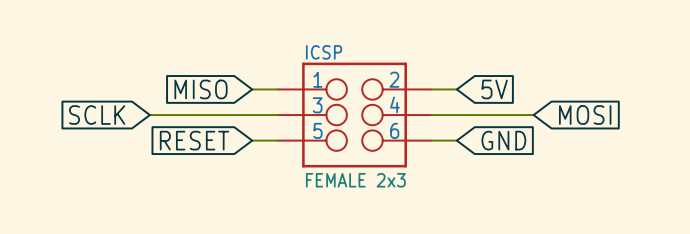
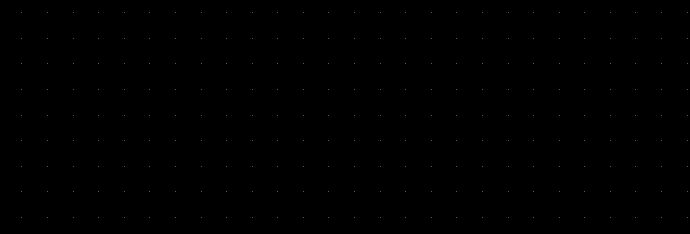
global label: MISO (201, 89) -> none
wire: (252, 89) (277, 89) -> none
wire: (431, 89) (456, 89) -> none
global label: 5V (494, 89) -> none
global label: SCLK (97, 115) -> none
wire: (149, 115) (277, 115) -> none
ICSP: FEMALE 2x3 (354, 115) -> none
wire: (431, 115) (533, 115) -> none
global label: MOSI (585, 115) -> none
global label: RESET (194, 140) -> none
wire: (252, 140) (277, 140) -> none
wire: (431, 140) (456, 140) -> none
global label: GND (503, 140) -> none

